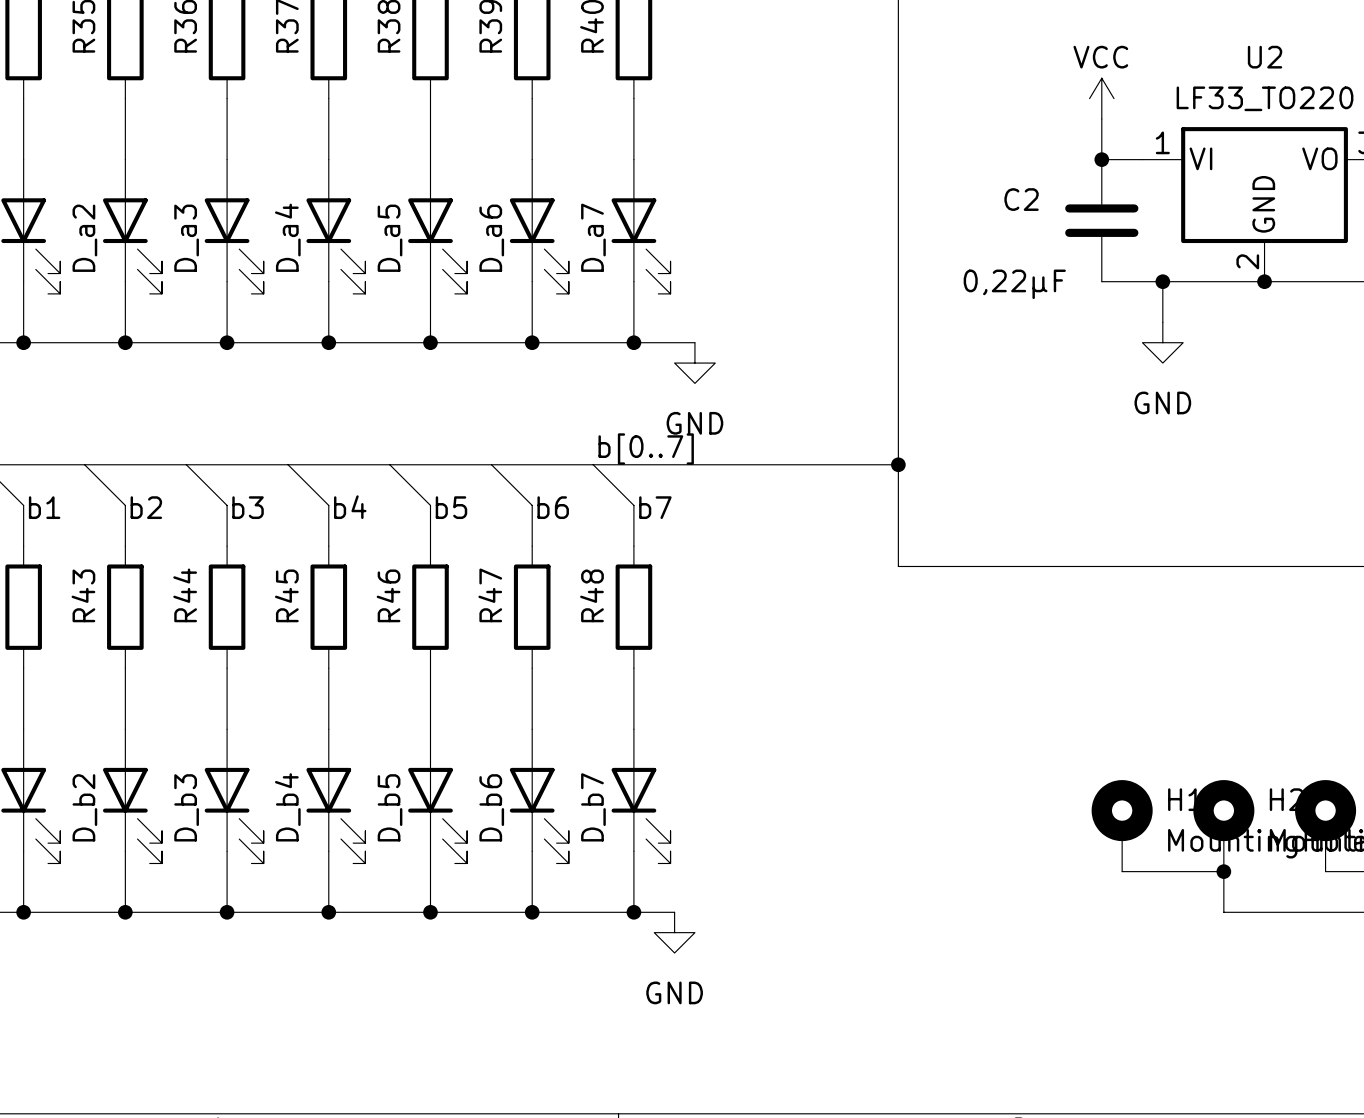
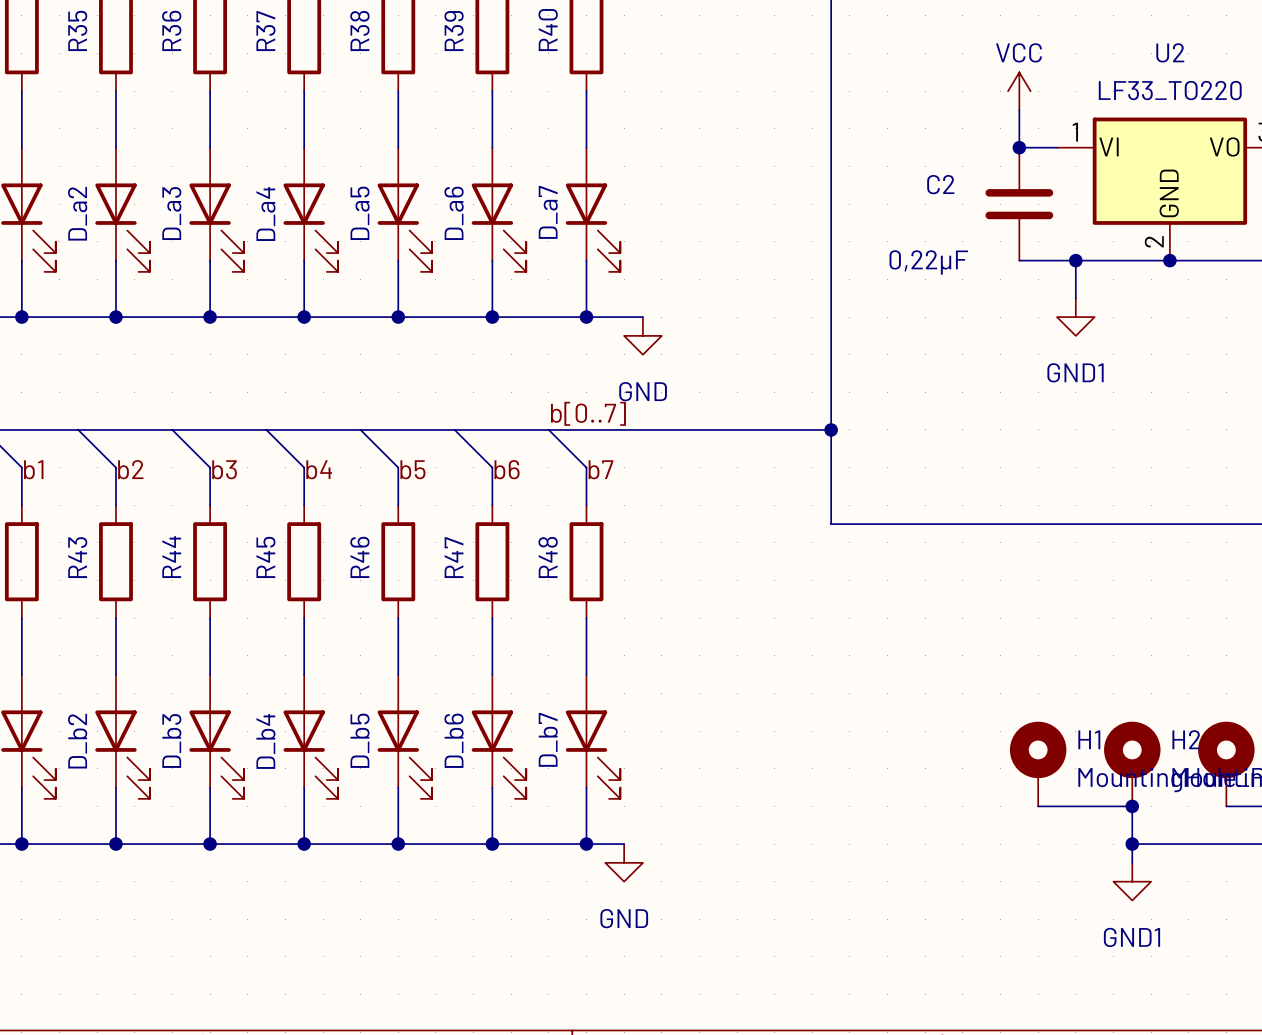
power symbol: GND (1162, 342) -> GND1 (1075, 317)
wire: none -> (1132, 844) (1132, 862)
junction: none -> (1132, 844)
power symbol: none -> GND1 (1132, 881)

